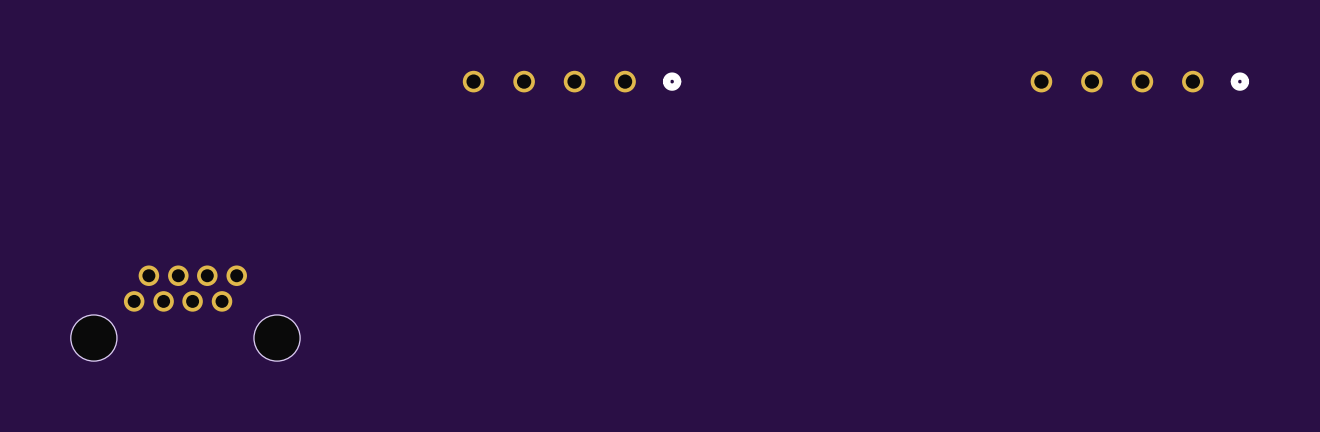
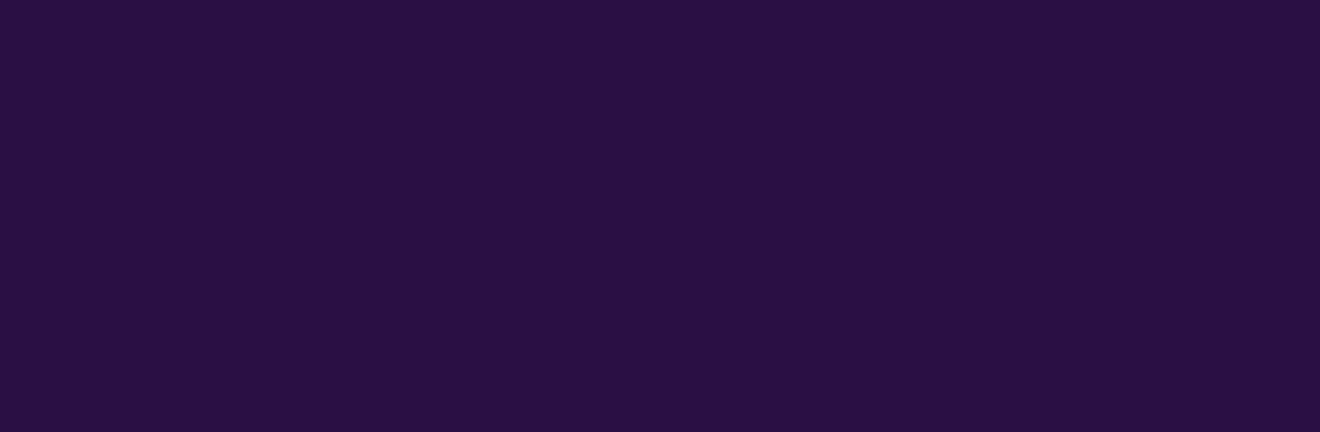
part: (572, 81) -> none
part: (1139, 81) -> none
part: (185, 313) -> none

